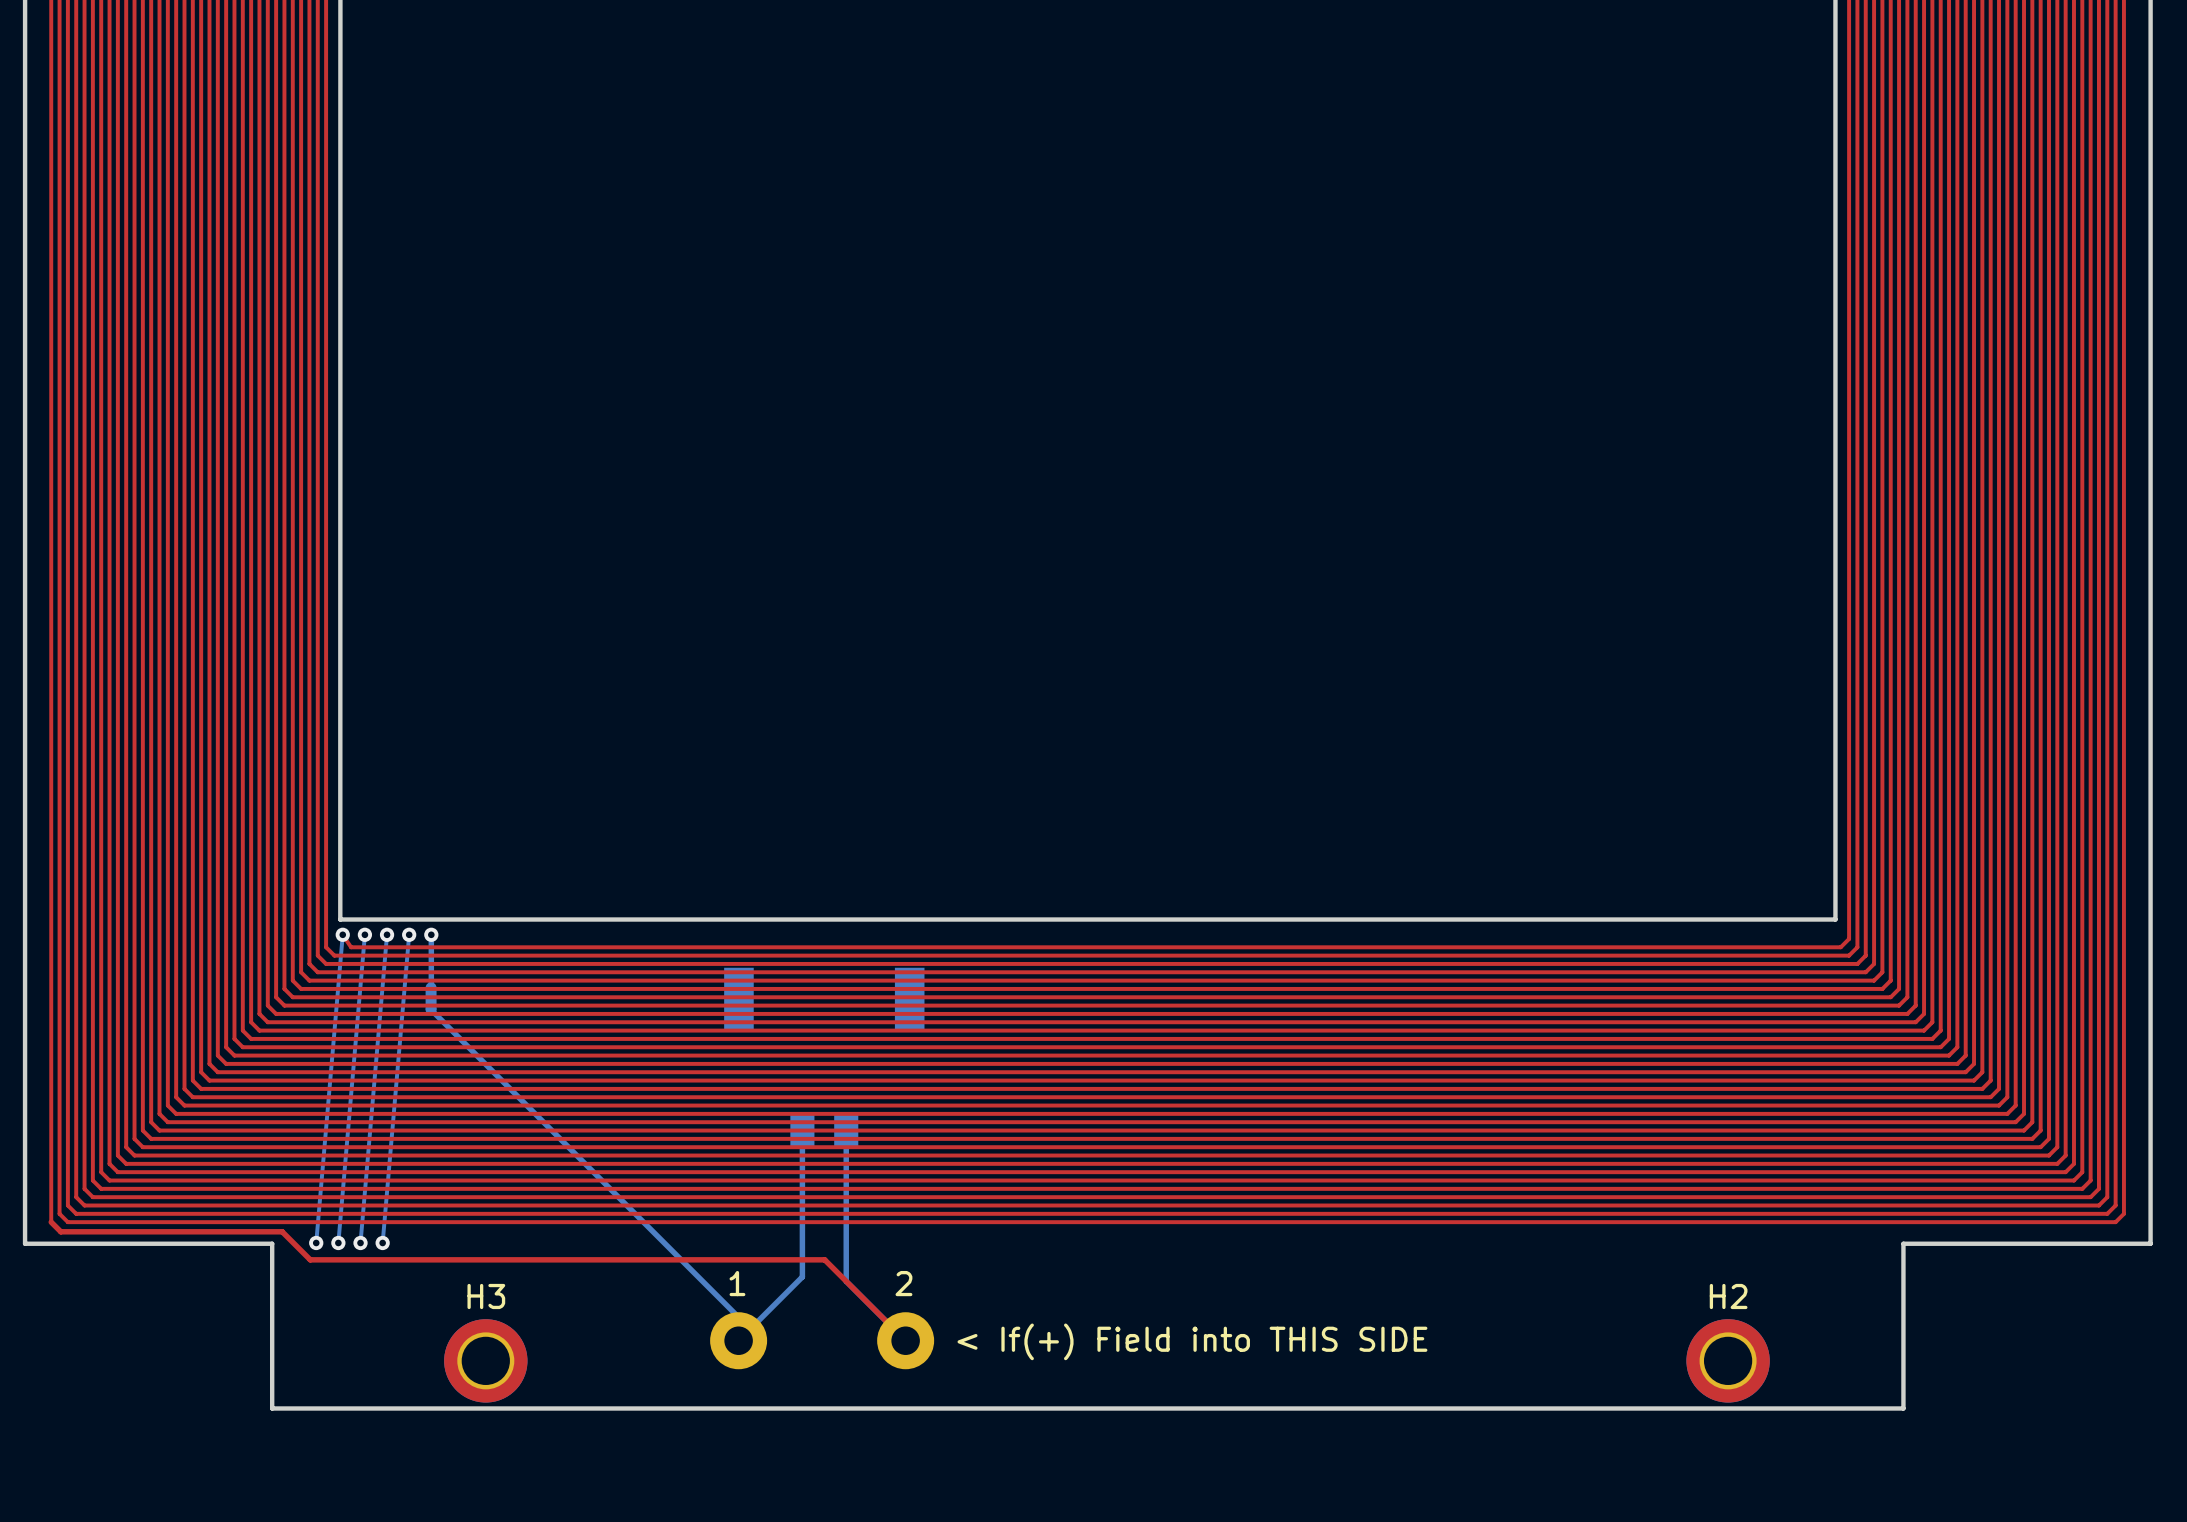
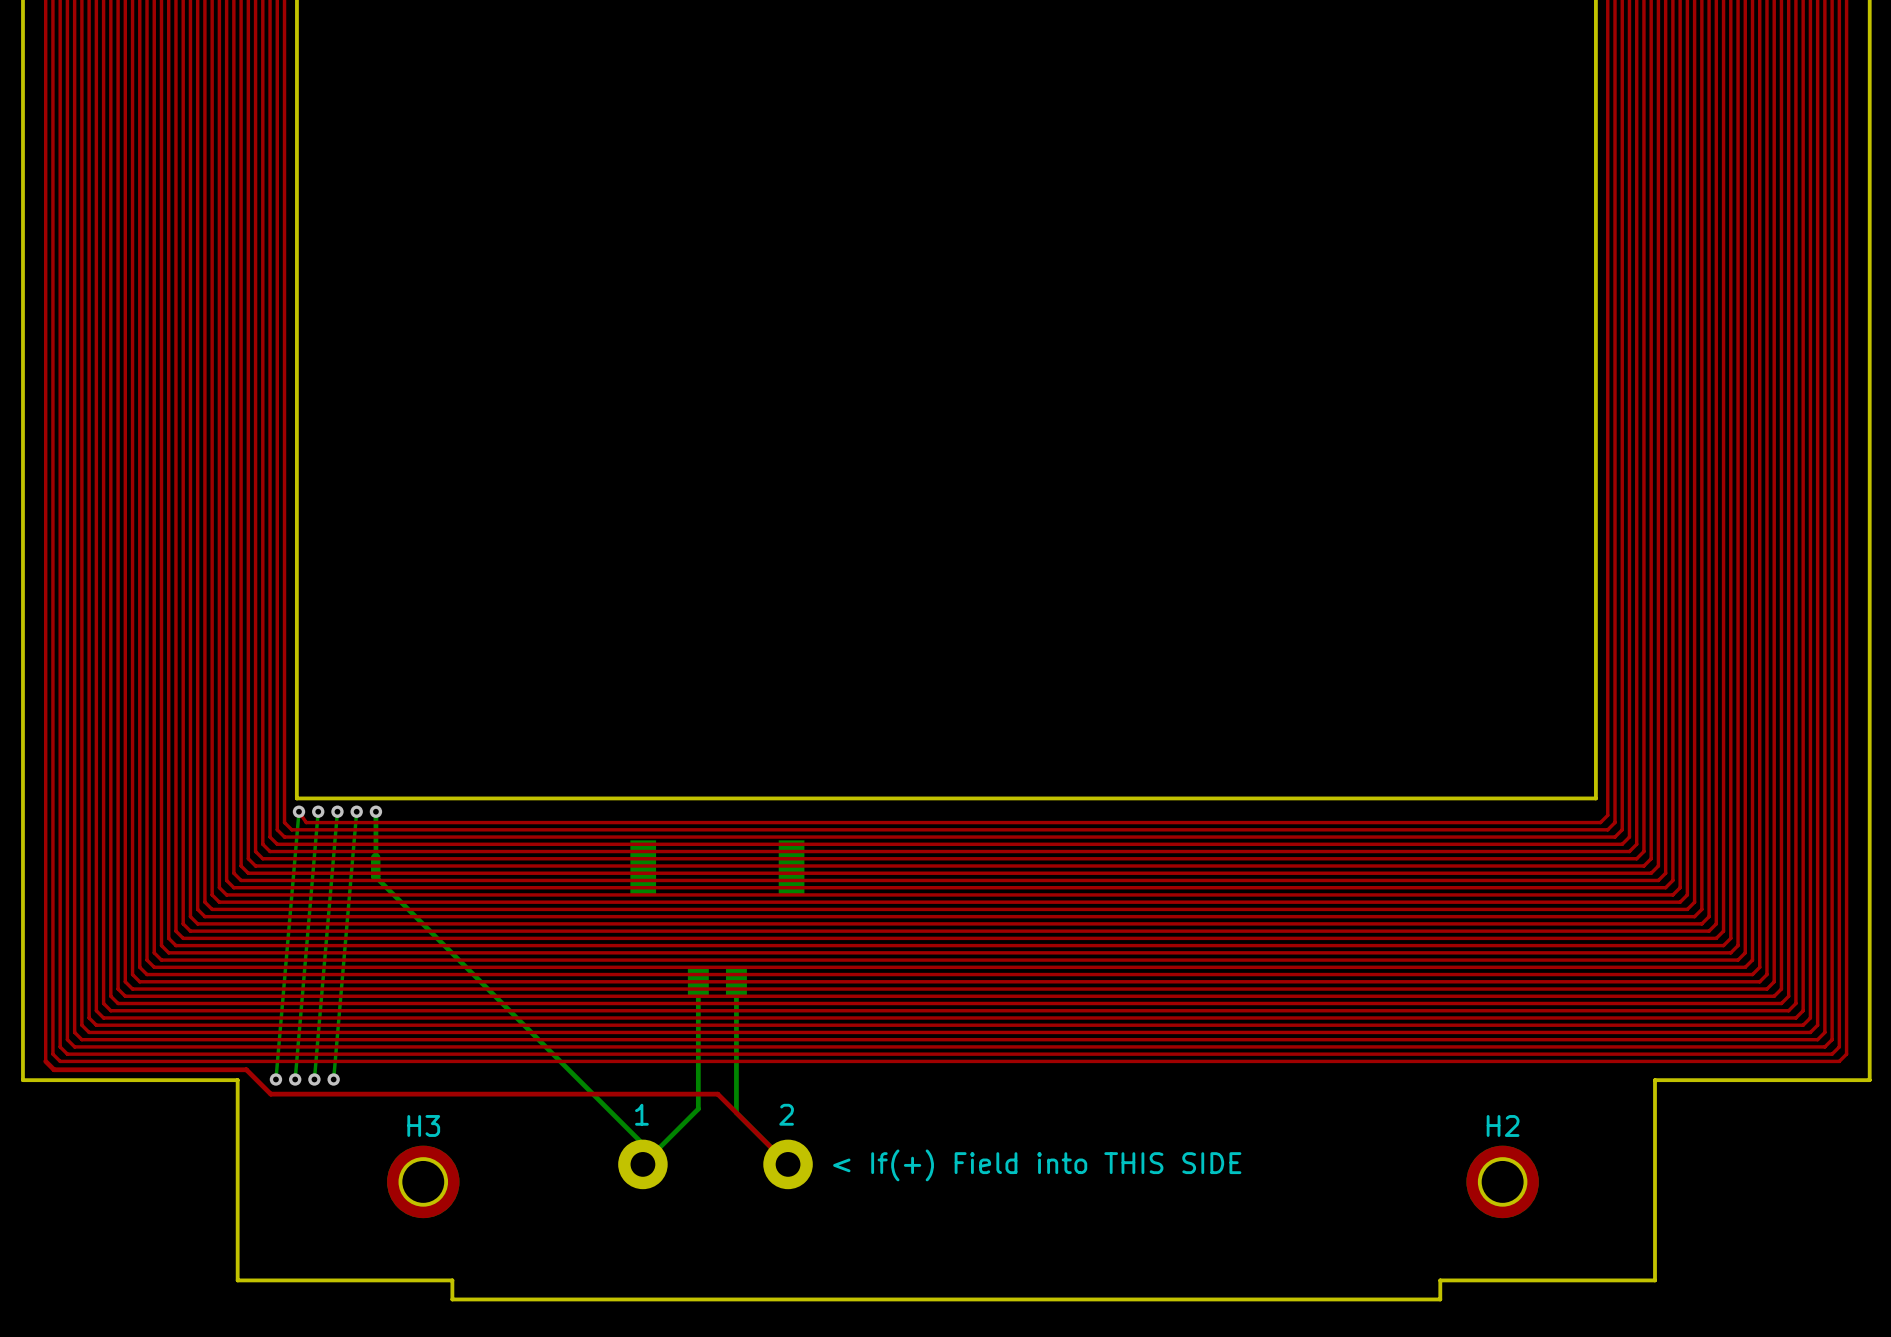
board edge: (272, 1408) (1903, 1408) -> (237, 1223) (237, 1280) (452, 1280) (452, 1299) (1440, 1299) (1440, 1280) (1654, 1280) (1654, 1223)

